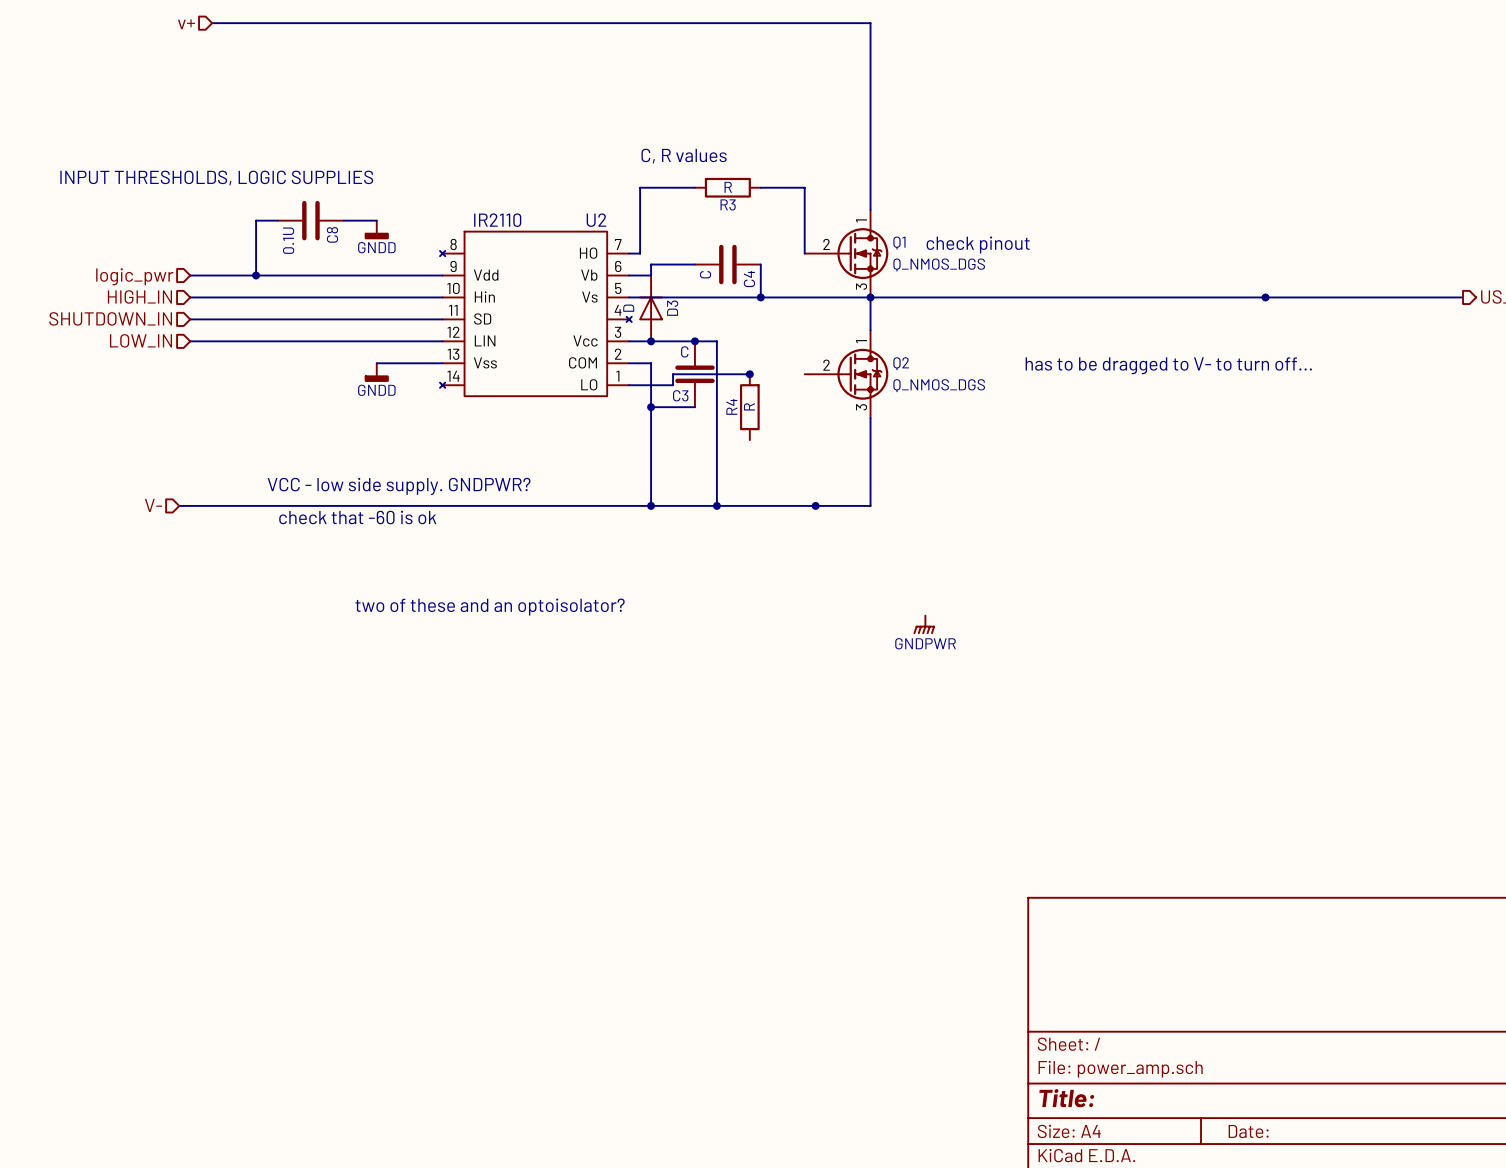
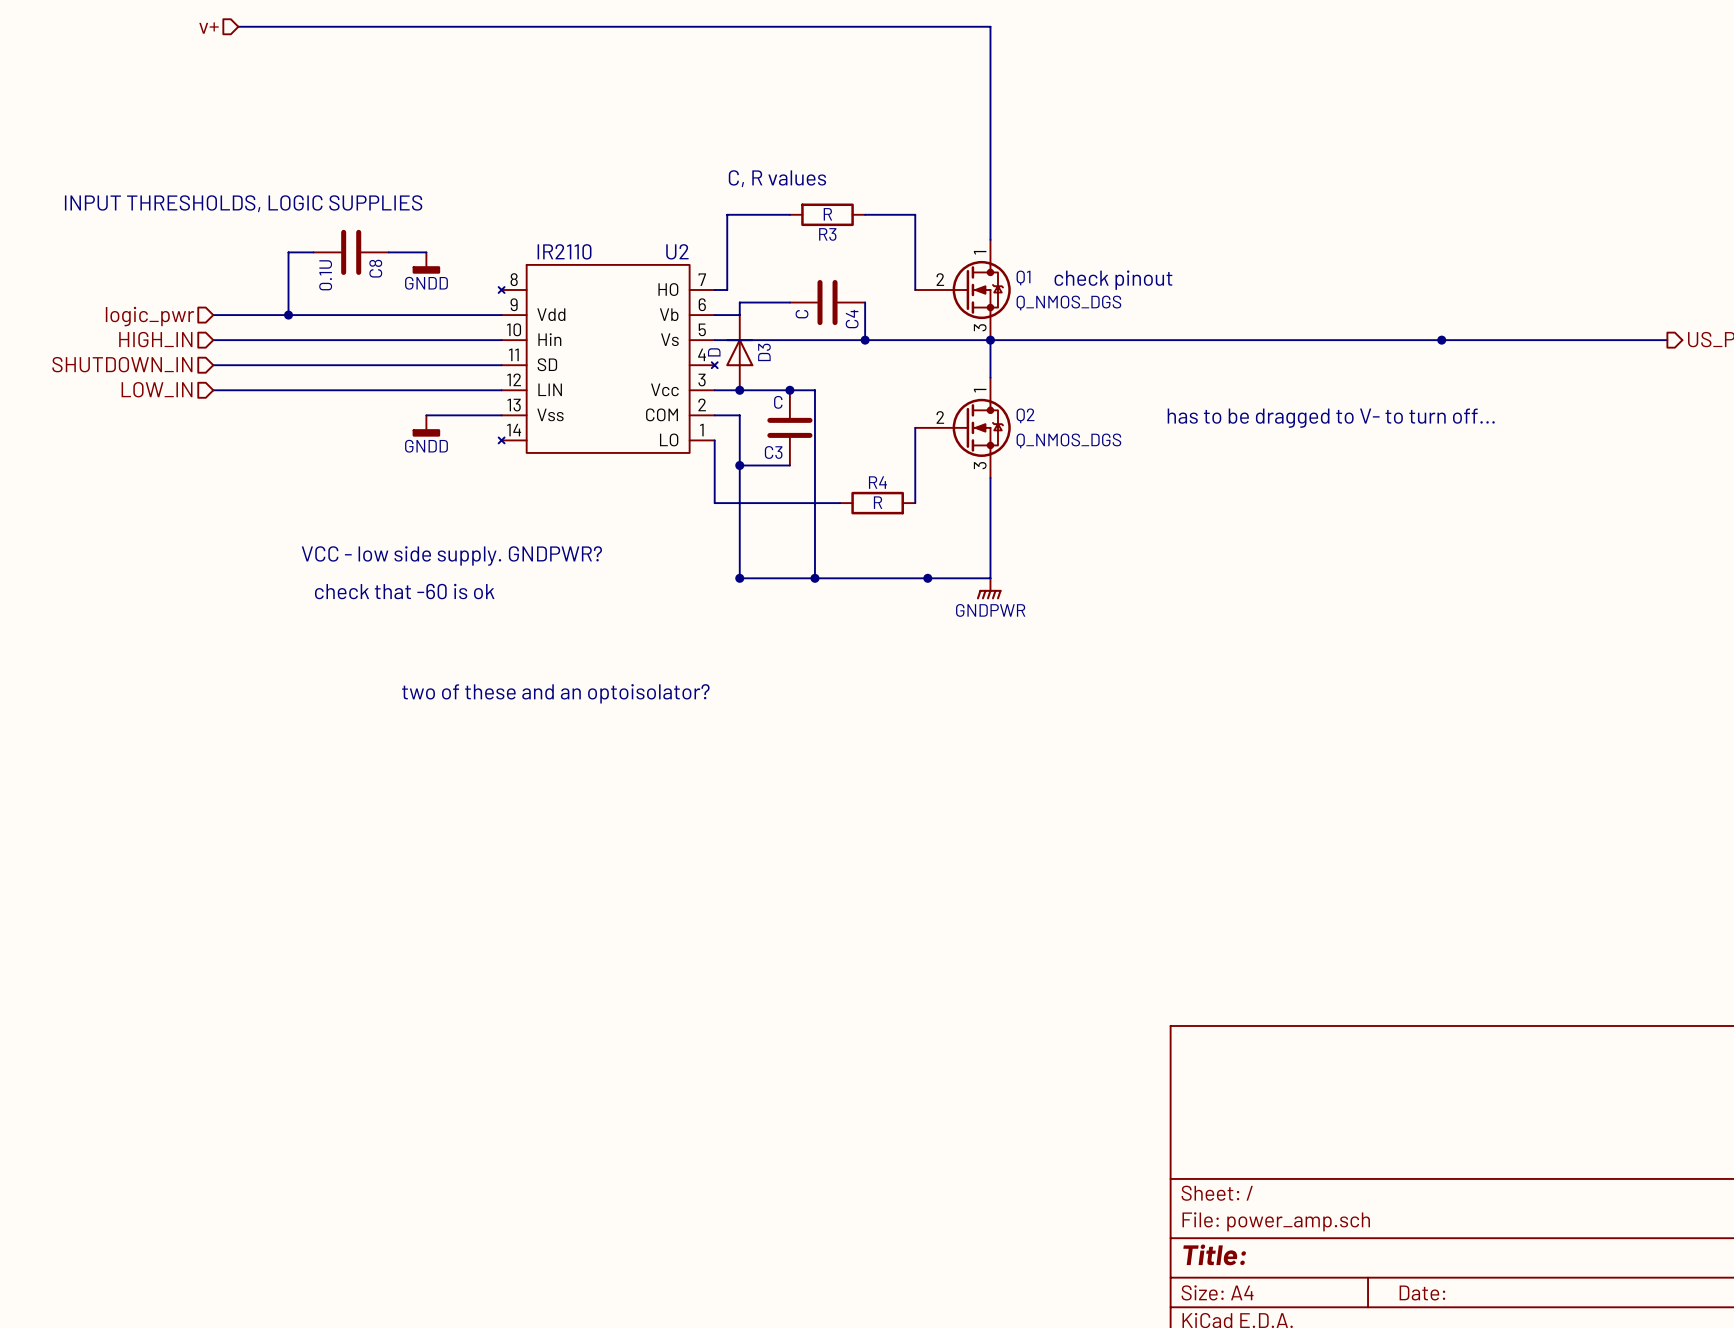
wire: (749, 374) (673, 374) (673, 385) (629, 385) -> (840, 503) (714, 503) (714, 440)
junction: (749, 374) -> none
wire: none -> (915, 427) (915, 503)
R4 rotation: 0° (749, 407) -> 90° clockwise (877, 503)
R4 position: (749, 407) -> (877, 503)
hierarchical label: V- (153, 505) -> none
wire: (179, 505) (651, 505) -> none
power symbol position: GNDPWR (924, 624) -> GNDPWR (989, 588)

